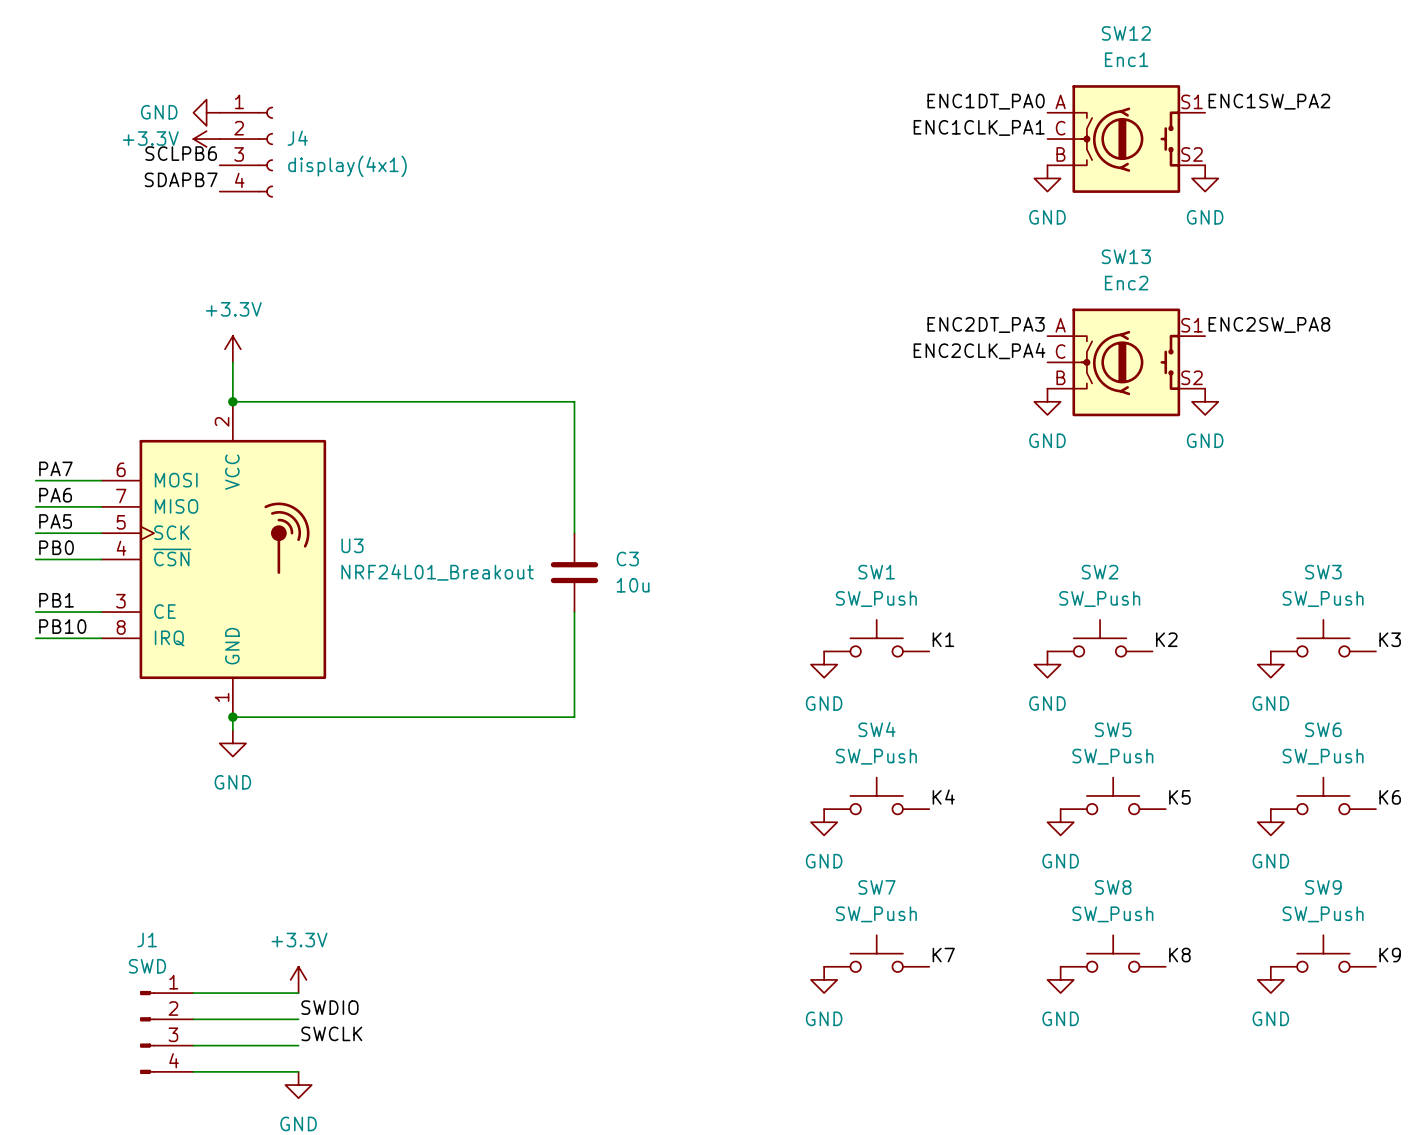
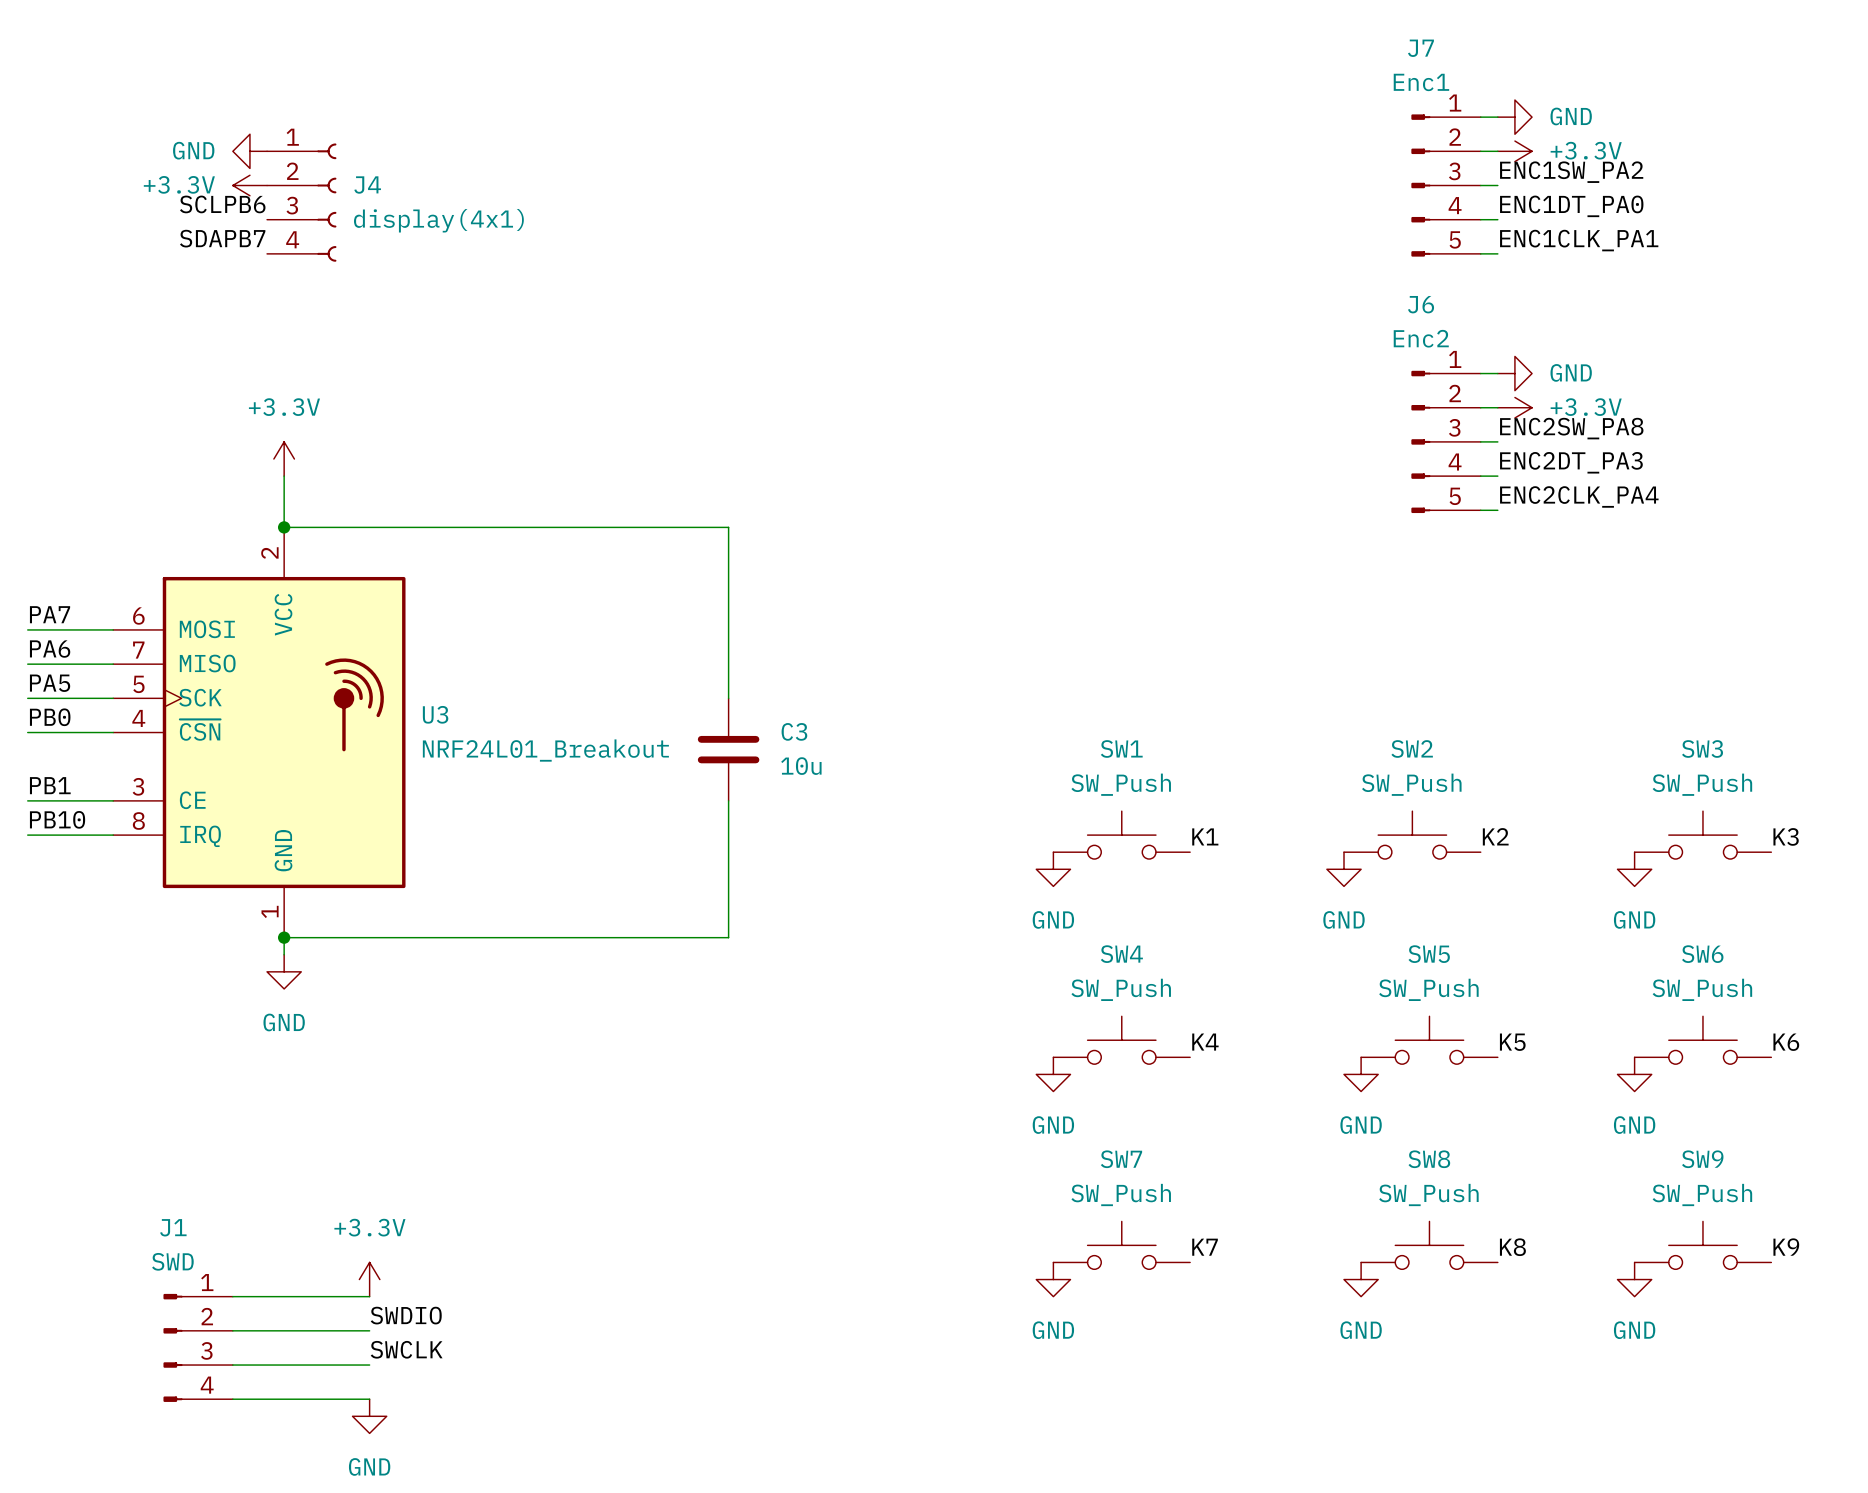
power symbol: none -> GND (1514, 117)
label position: ENC1DT_PA0 (986, 101) -> ENC1DT_PA0 (1571, 206)
label position: ENC1SW_PA2 (1269, 101) -> ENC1SW_PA2 (1571, 172)
power symbol: none -> +3.3V (1514, 151)
label position: ENC1CLK_PA1 (979, 127) -> ENC1CLK_PA1 (1579, 240)
J7: none -> Enc1 (1446, 185)
SW12: Enc1 (1126, 139) -> none
power symbol: GND (1047, 178) -> none
power symbol: GND (1205, 178) -> none
wire: none -> (1480, 373) (1497, 373)
power symbol: none -> GND (1514, 373)
power symbol: none -> +3.3V (1514, 407)
label position: ENC2DT_PA3 (986, 325) -> ENC2DT_PA3 (1571, 462)
label position: ENC2SW_PA8 (1269, 325) -> ENC2SW_PA8 (1571, 428)
J6: none -> Enc2 (1446, 441)
label position: ENC2CLK_PA4 (979, 350) -> ENC2CLK_PA4 (1579, 496)
SW13: Enc2 (1126, 362) -> none
power symbol: GND (1047, 401) -> none
power symbol: GND (1205, 401) -> none

